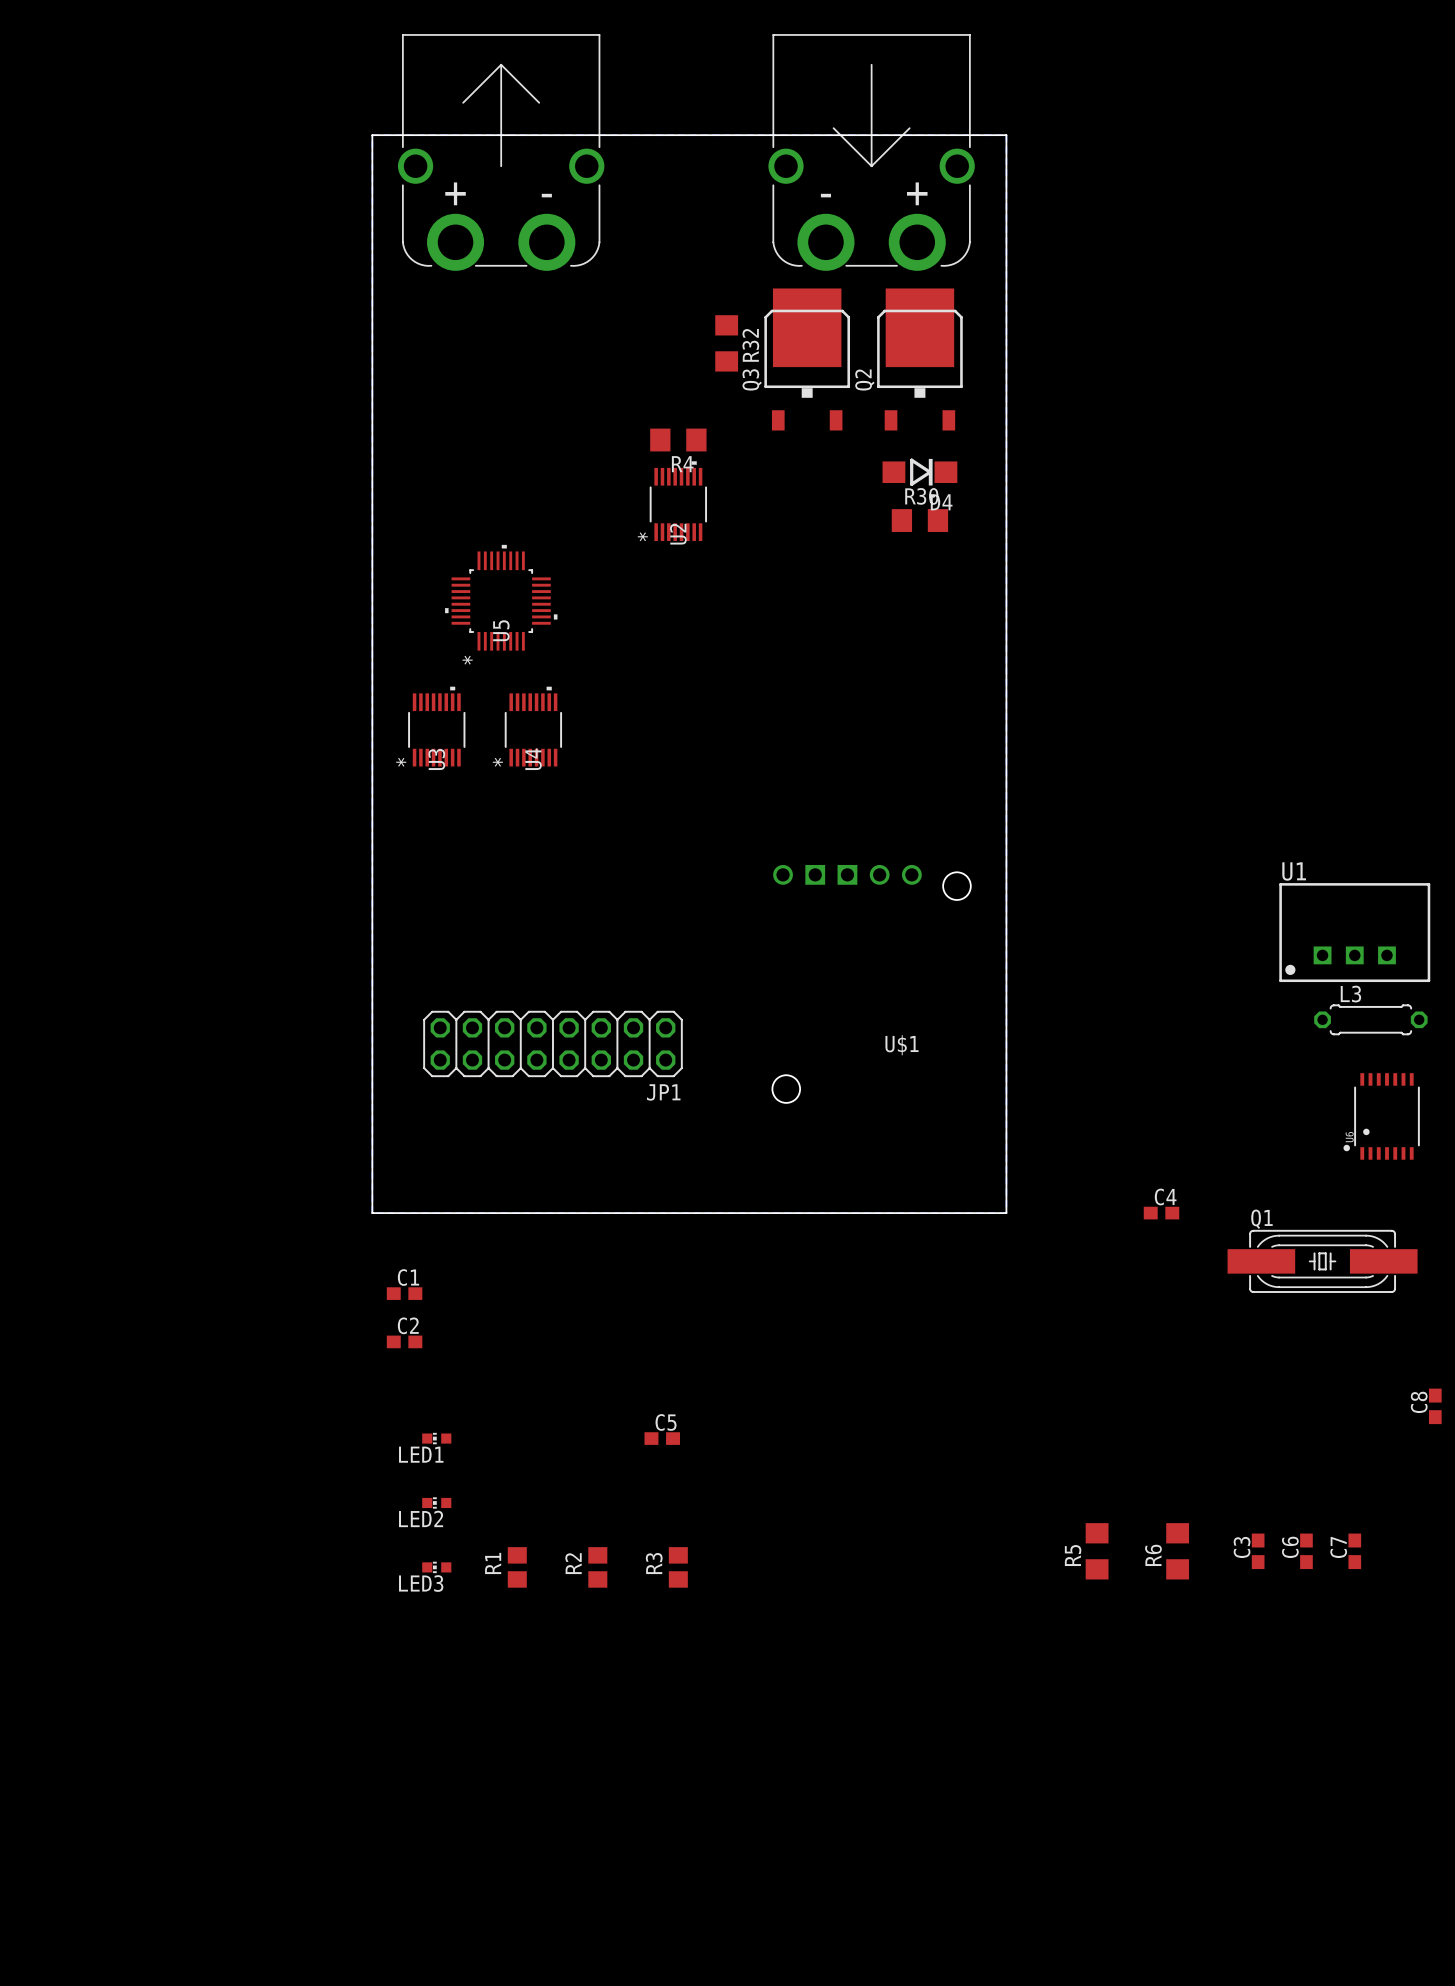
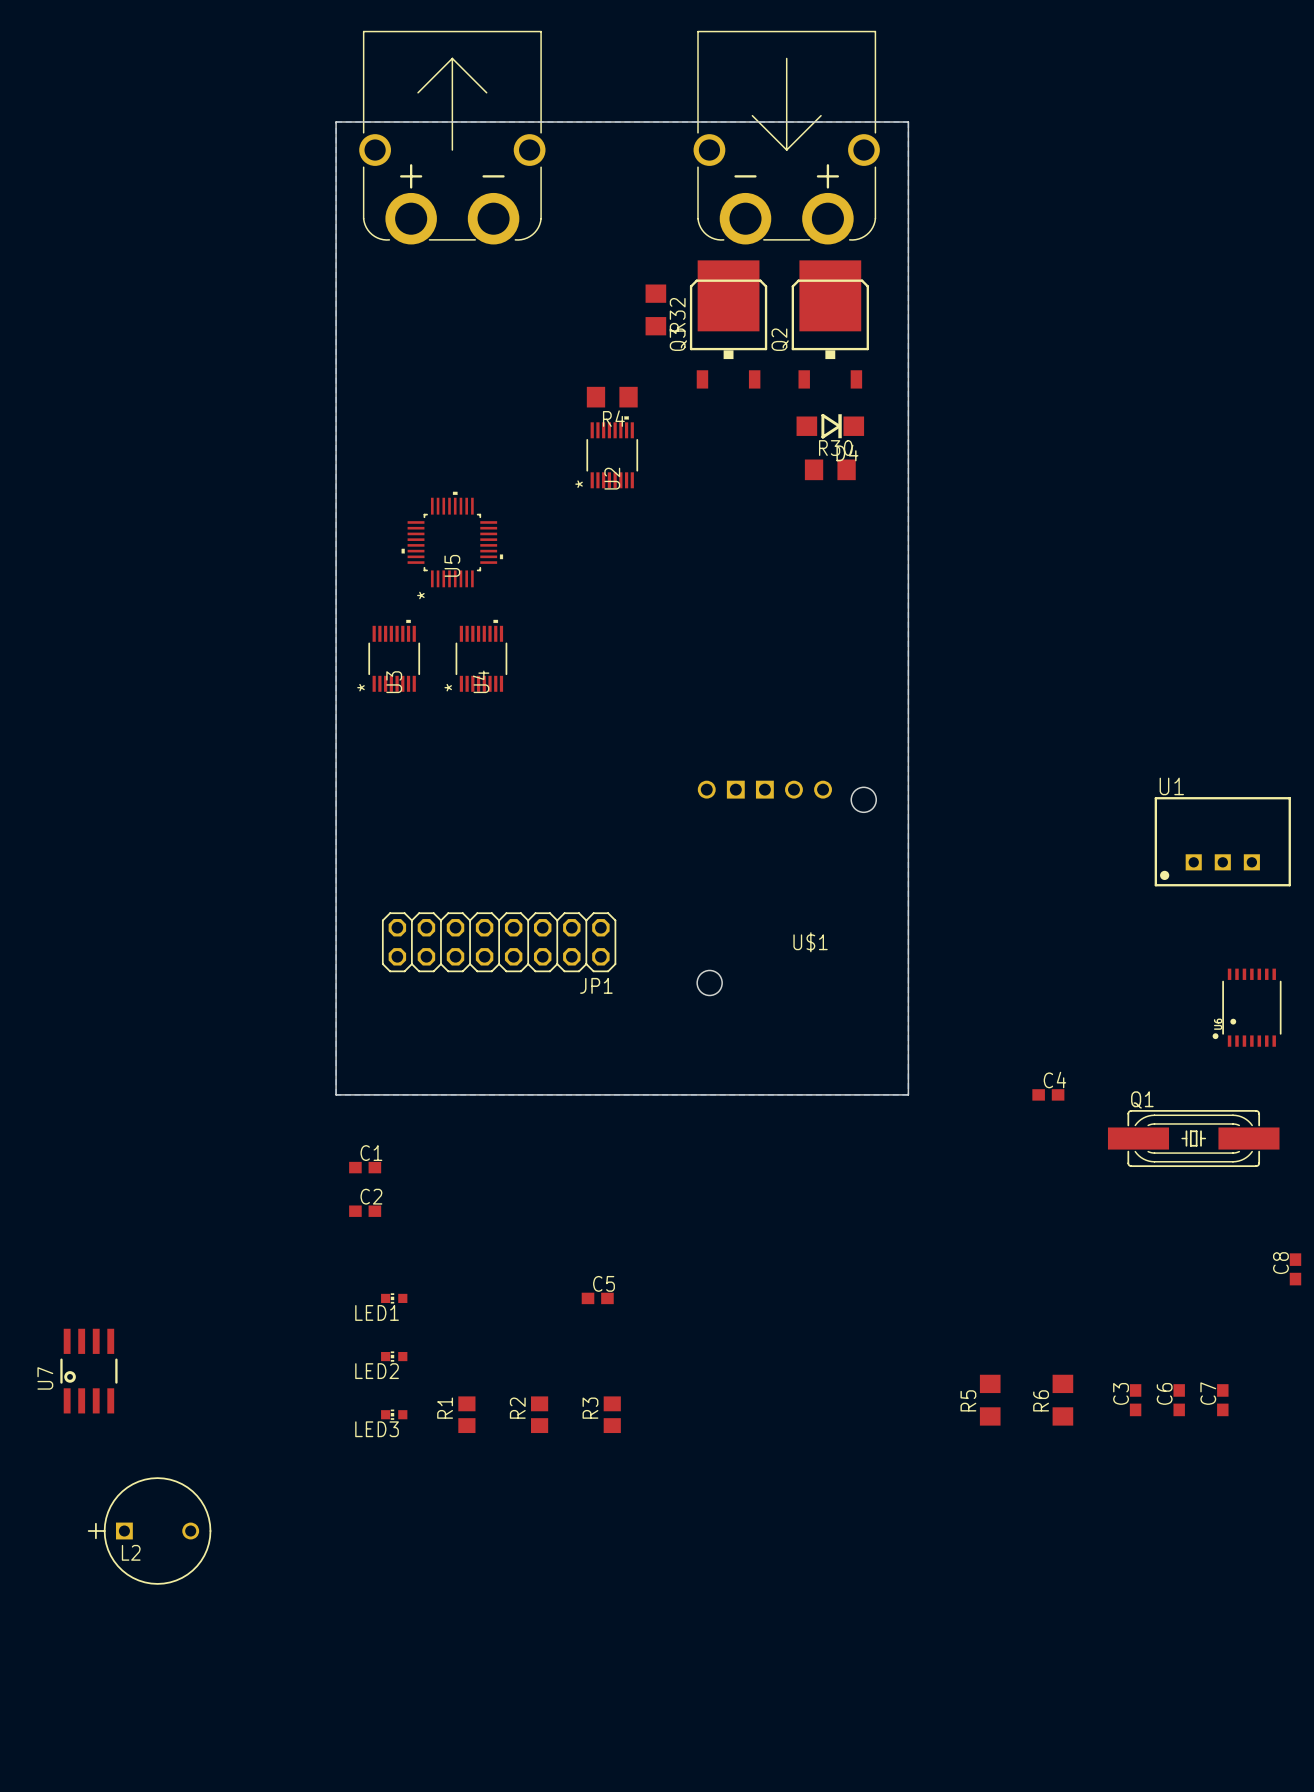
L3: (1370, 1019) -> none
U7: none -> (88, 1371)
L2: none -> (149, 1531)

